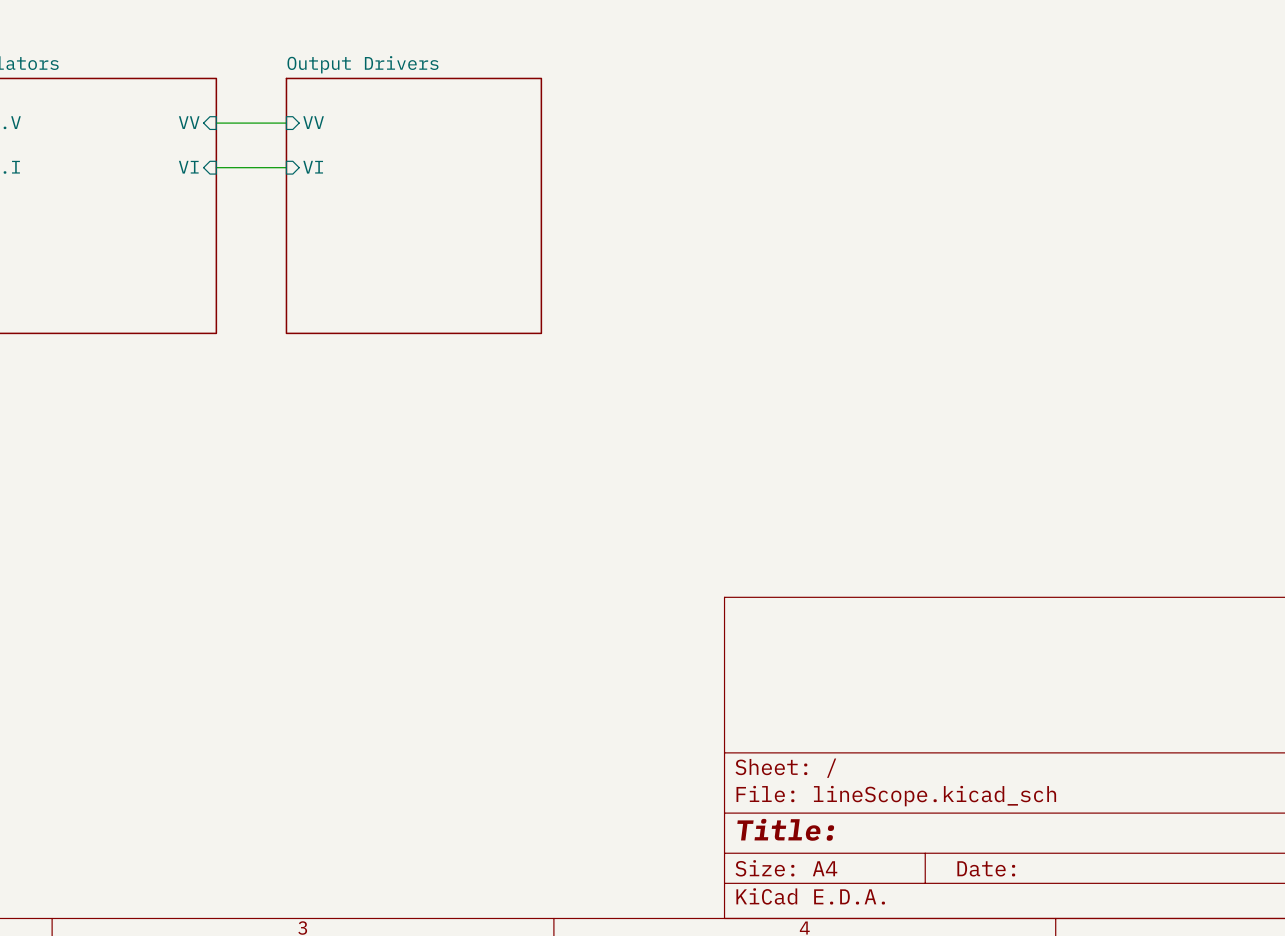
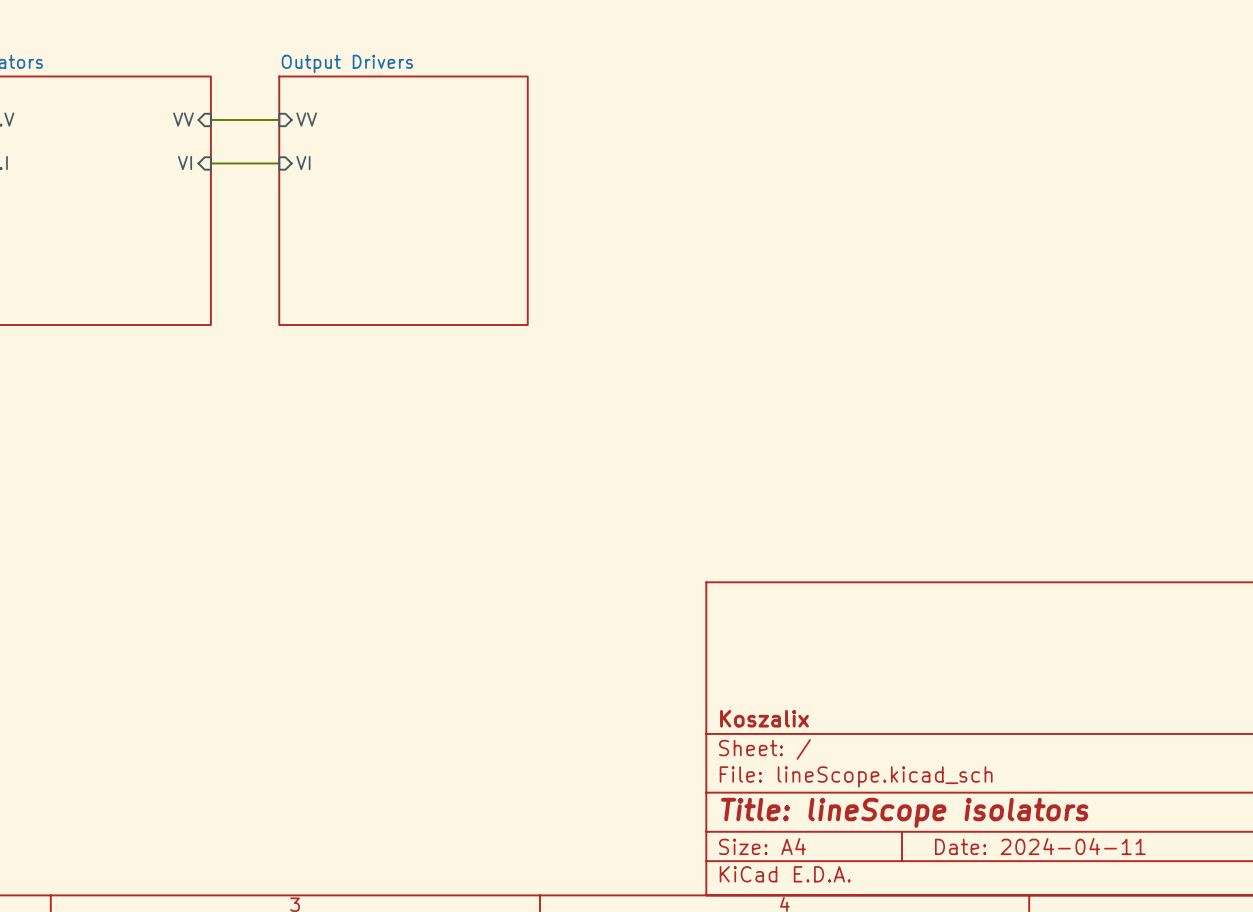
title block: none -> Koszalix (764, 718)
title block: Title: (785, 829) -> Title: lineScope isolators (904, 812)
title block: Date: (986, 868) -> Date: 2024-04-11 (1040, 846)

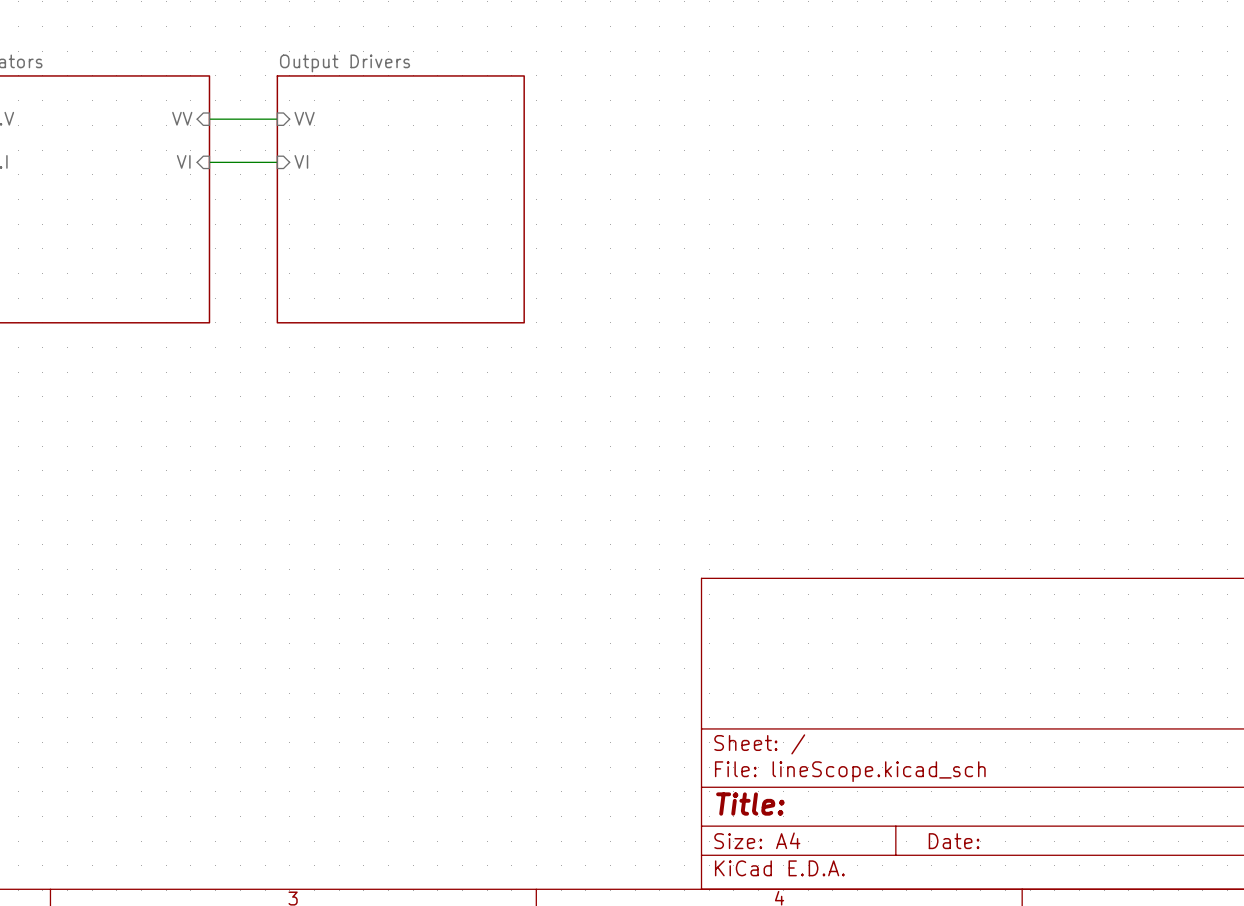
title block: Koszalix (764, 718) -> none
title block: Title: lineScope isolators (904, 812) -> Title: (750, 804)
title block: Date: 2024-04-11 (1040, 846) -> Date: (954, 841)

